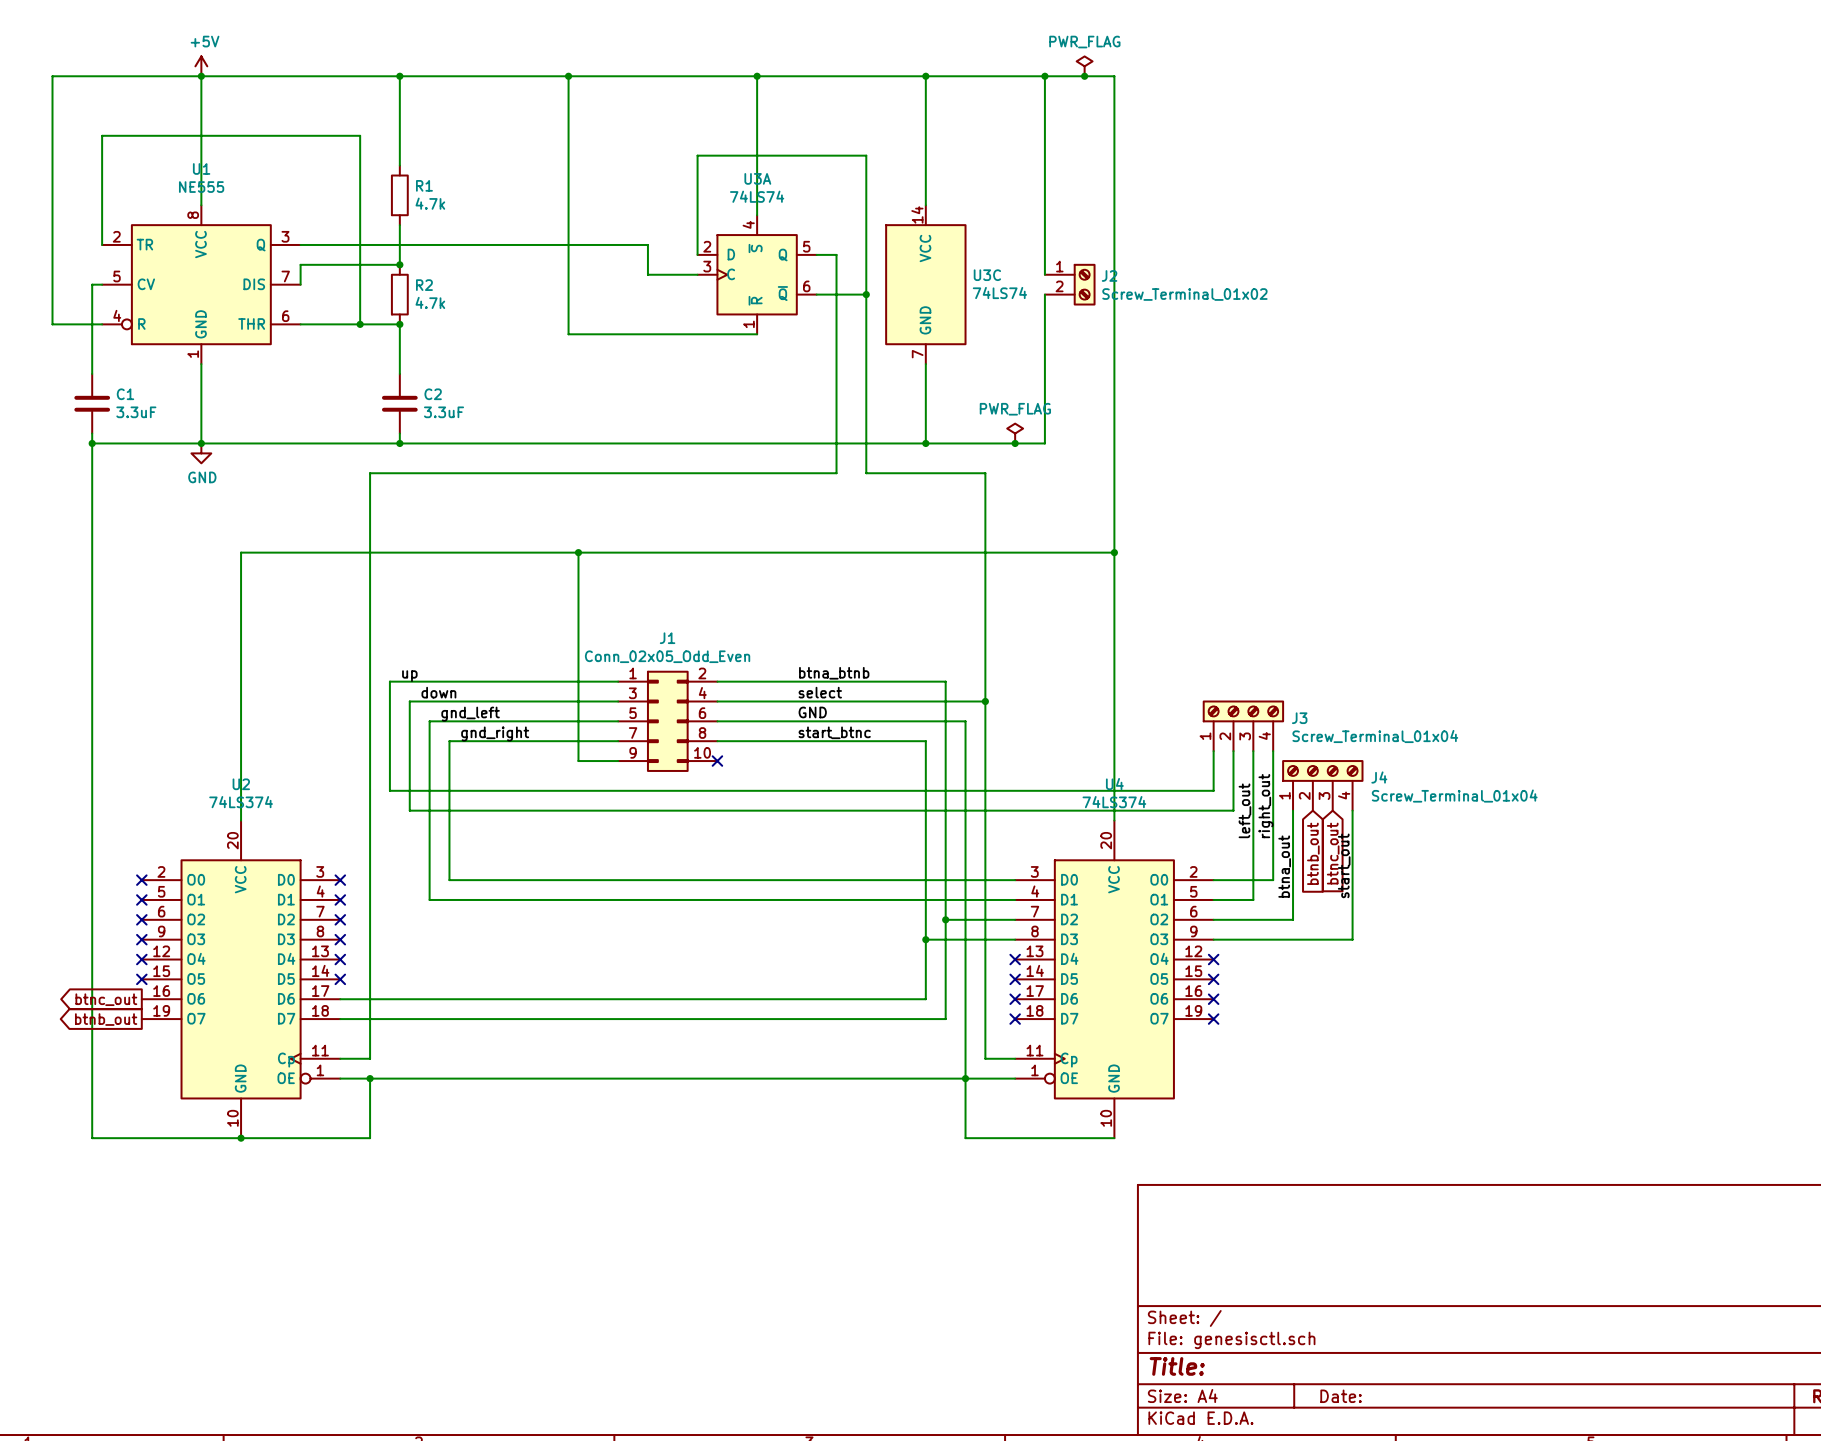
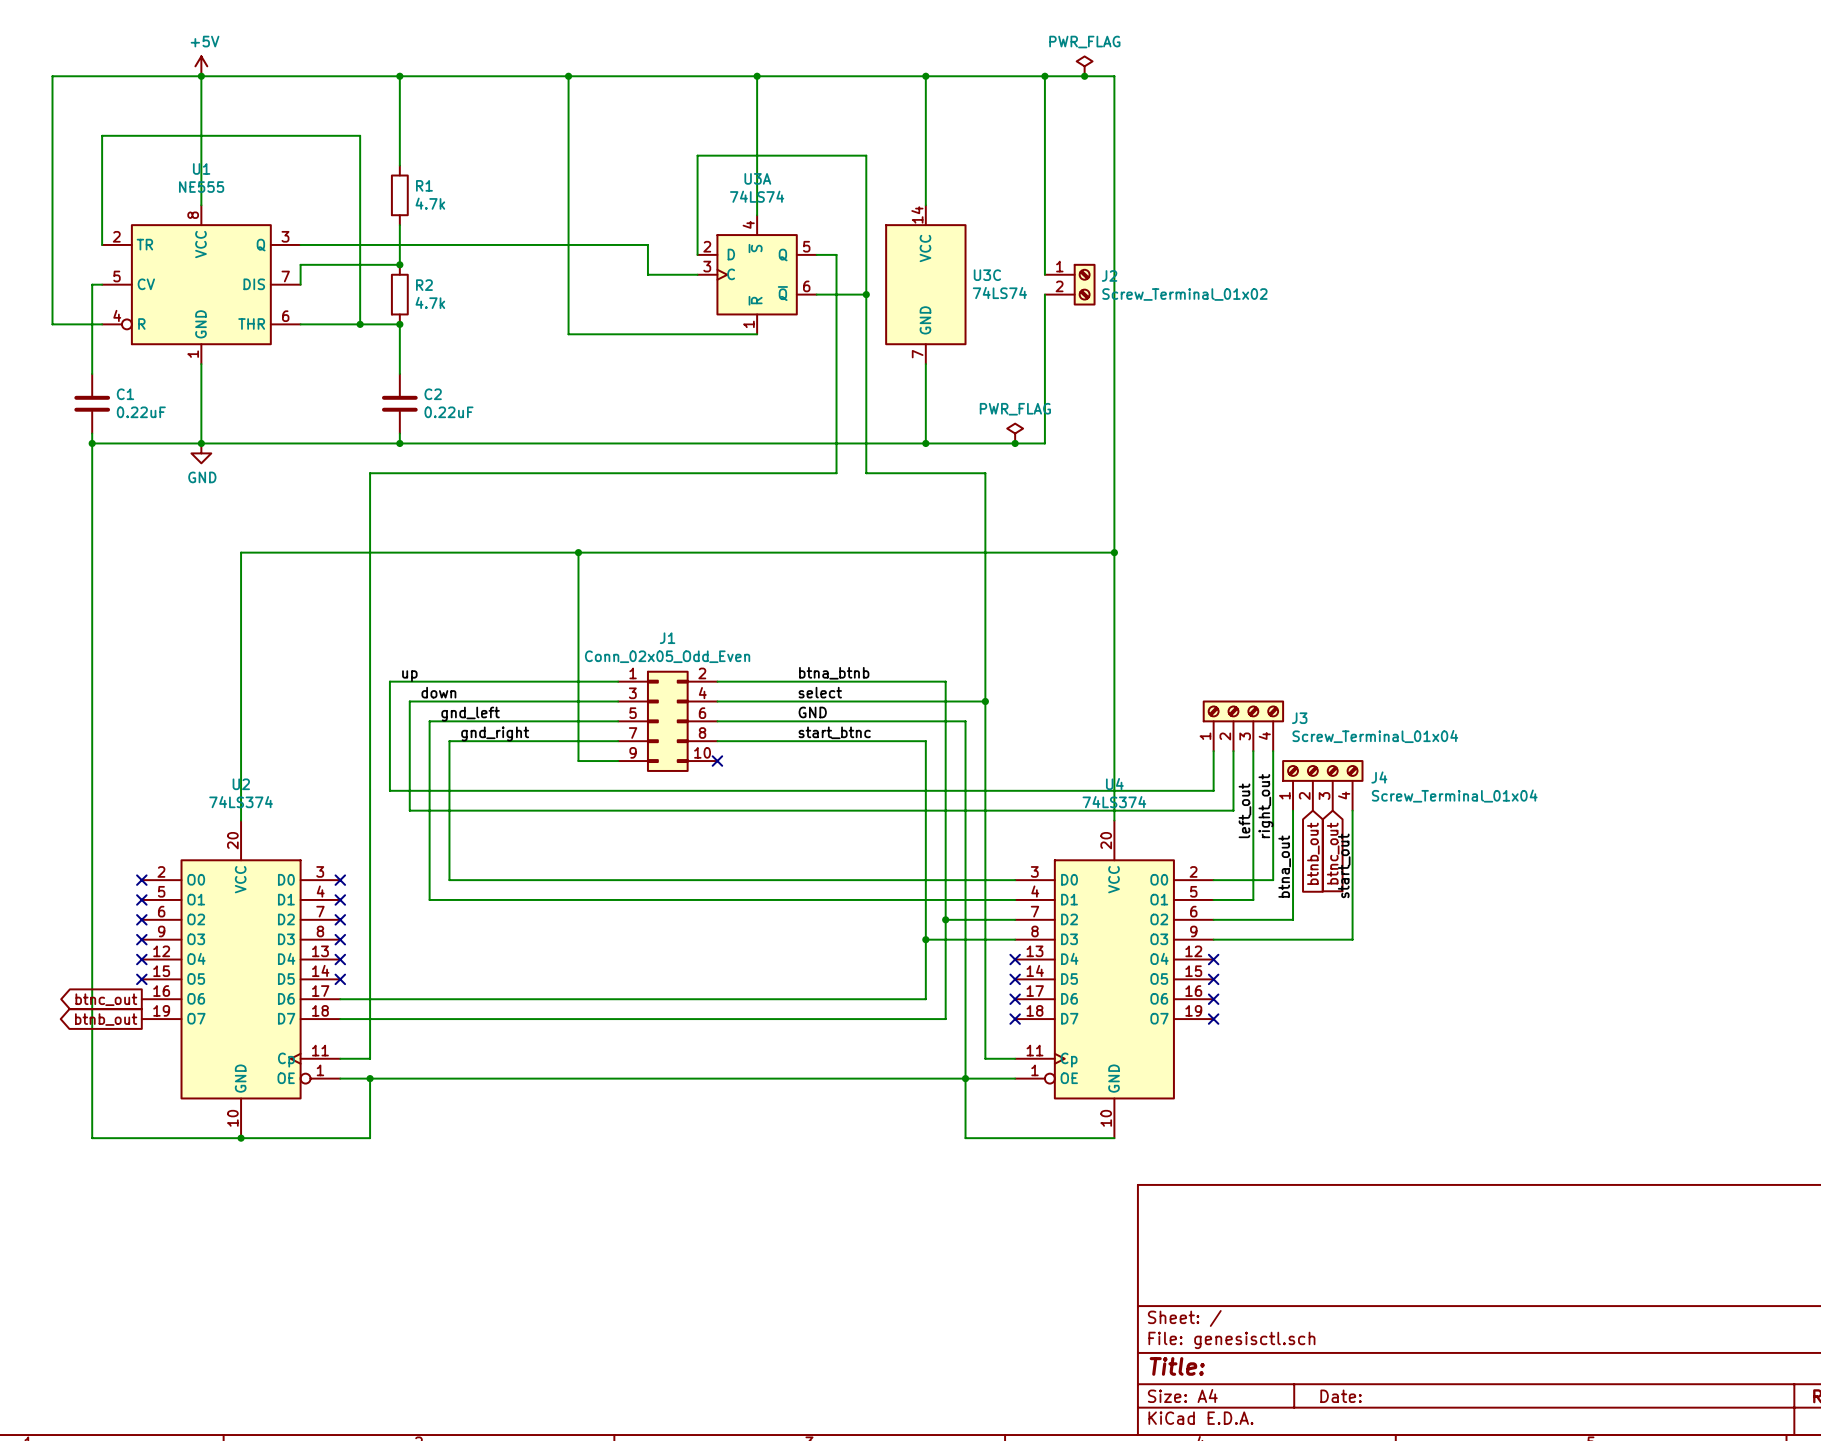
C1 value: 3.3uF (136, 412) -> 0.22uF (141, 412)
C2 value: 3.3uF (444, 412) -> 0.22uF (448, 412)

